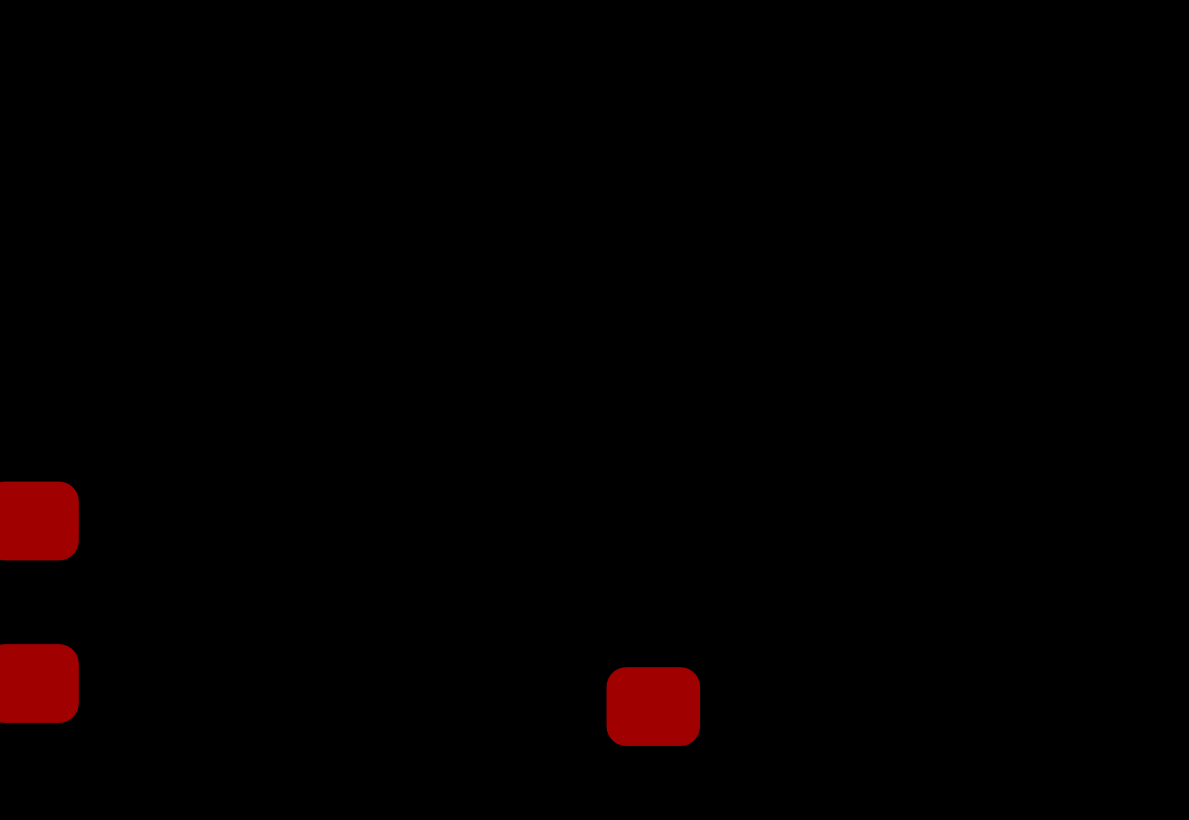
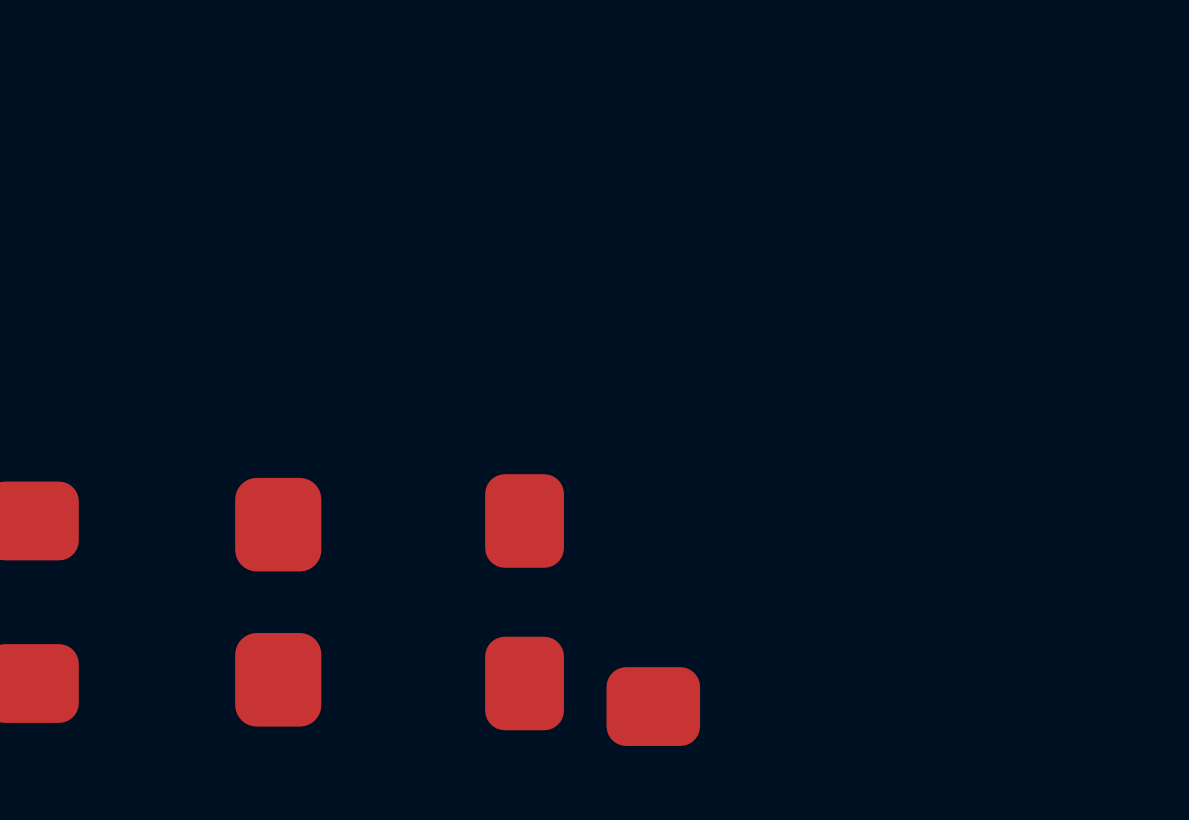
part: none -> (278, 602)
part: none -> (524, 602)

